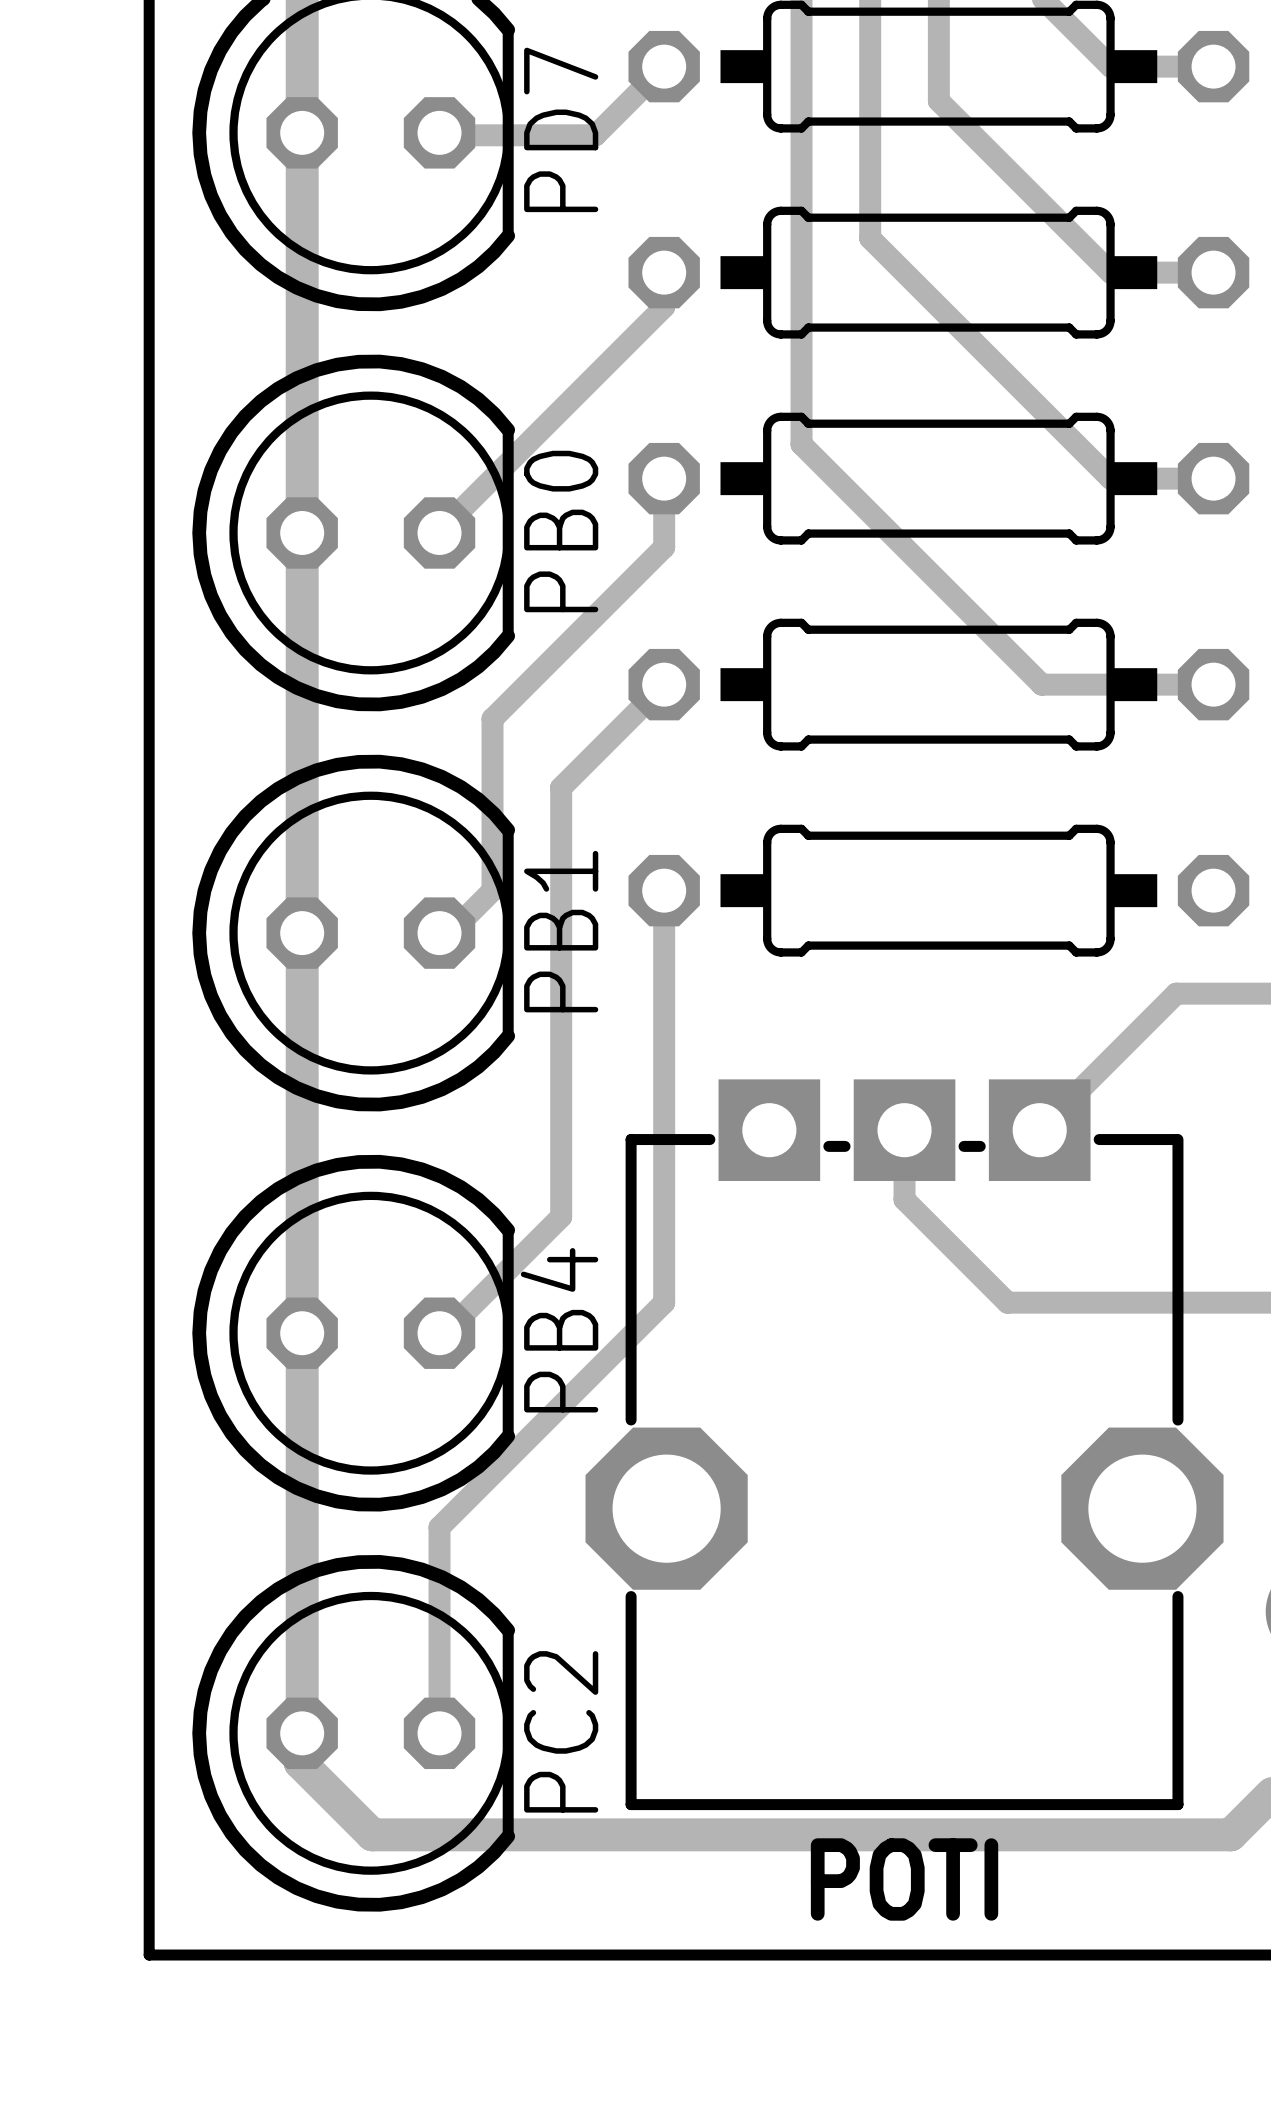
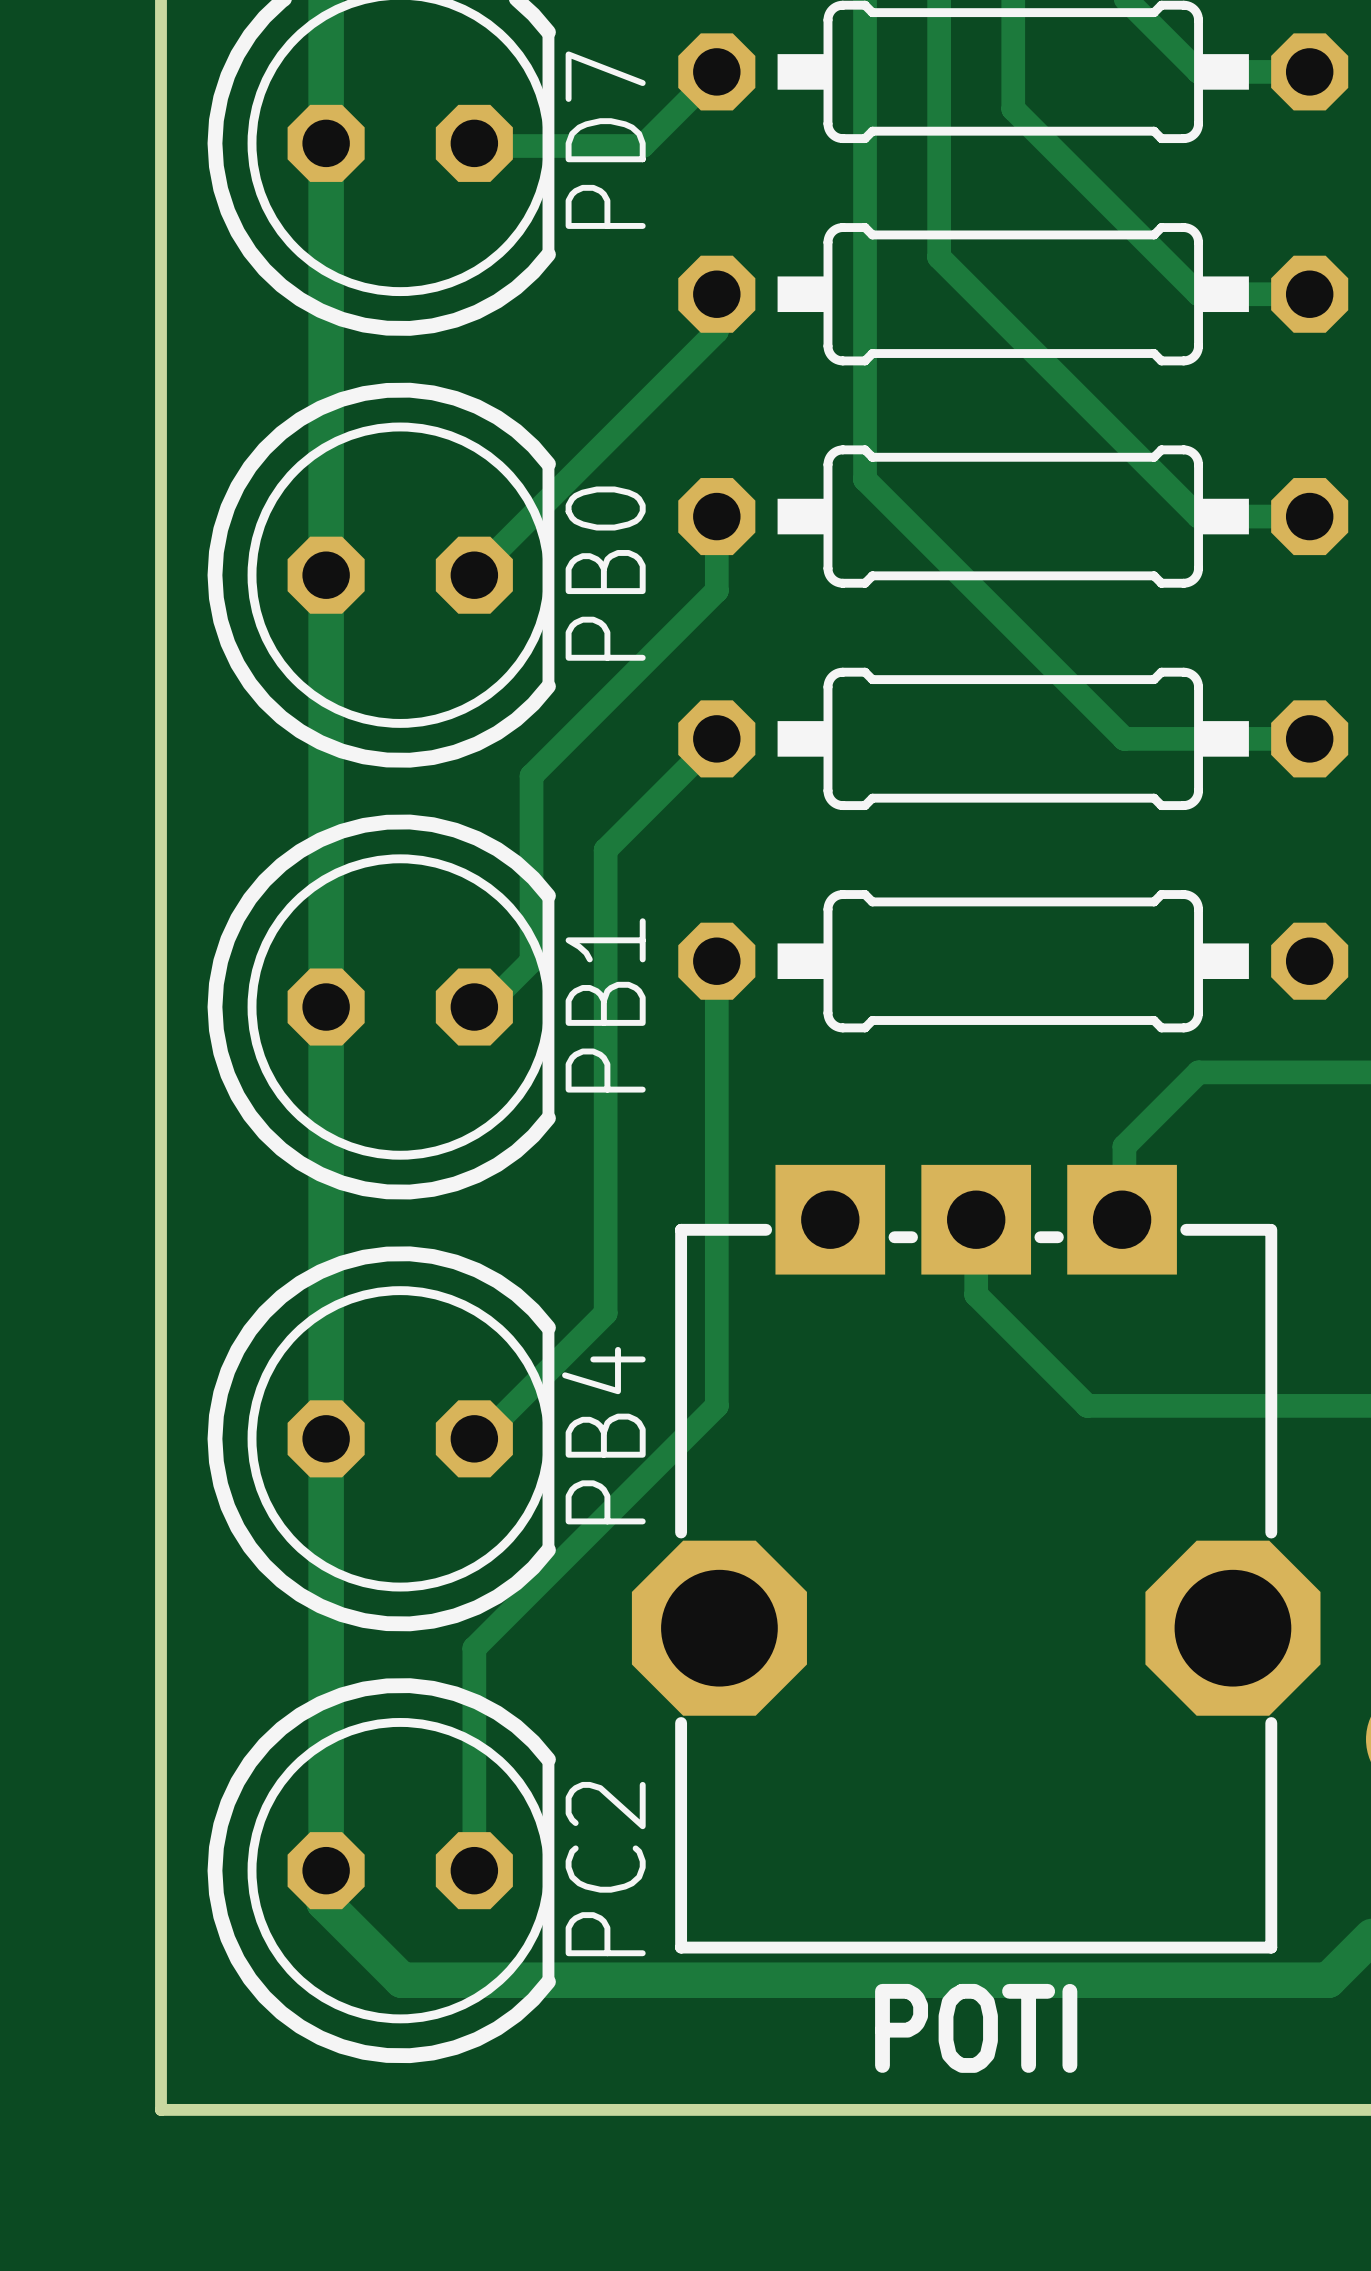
track: (1176, 993) (1041, 1128) -> (1269, 1072) (1198, 1072) (1124, 1146) (1124, 1217)

